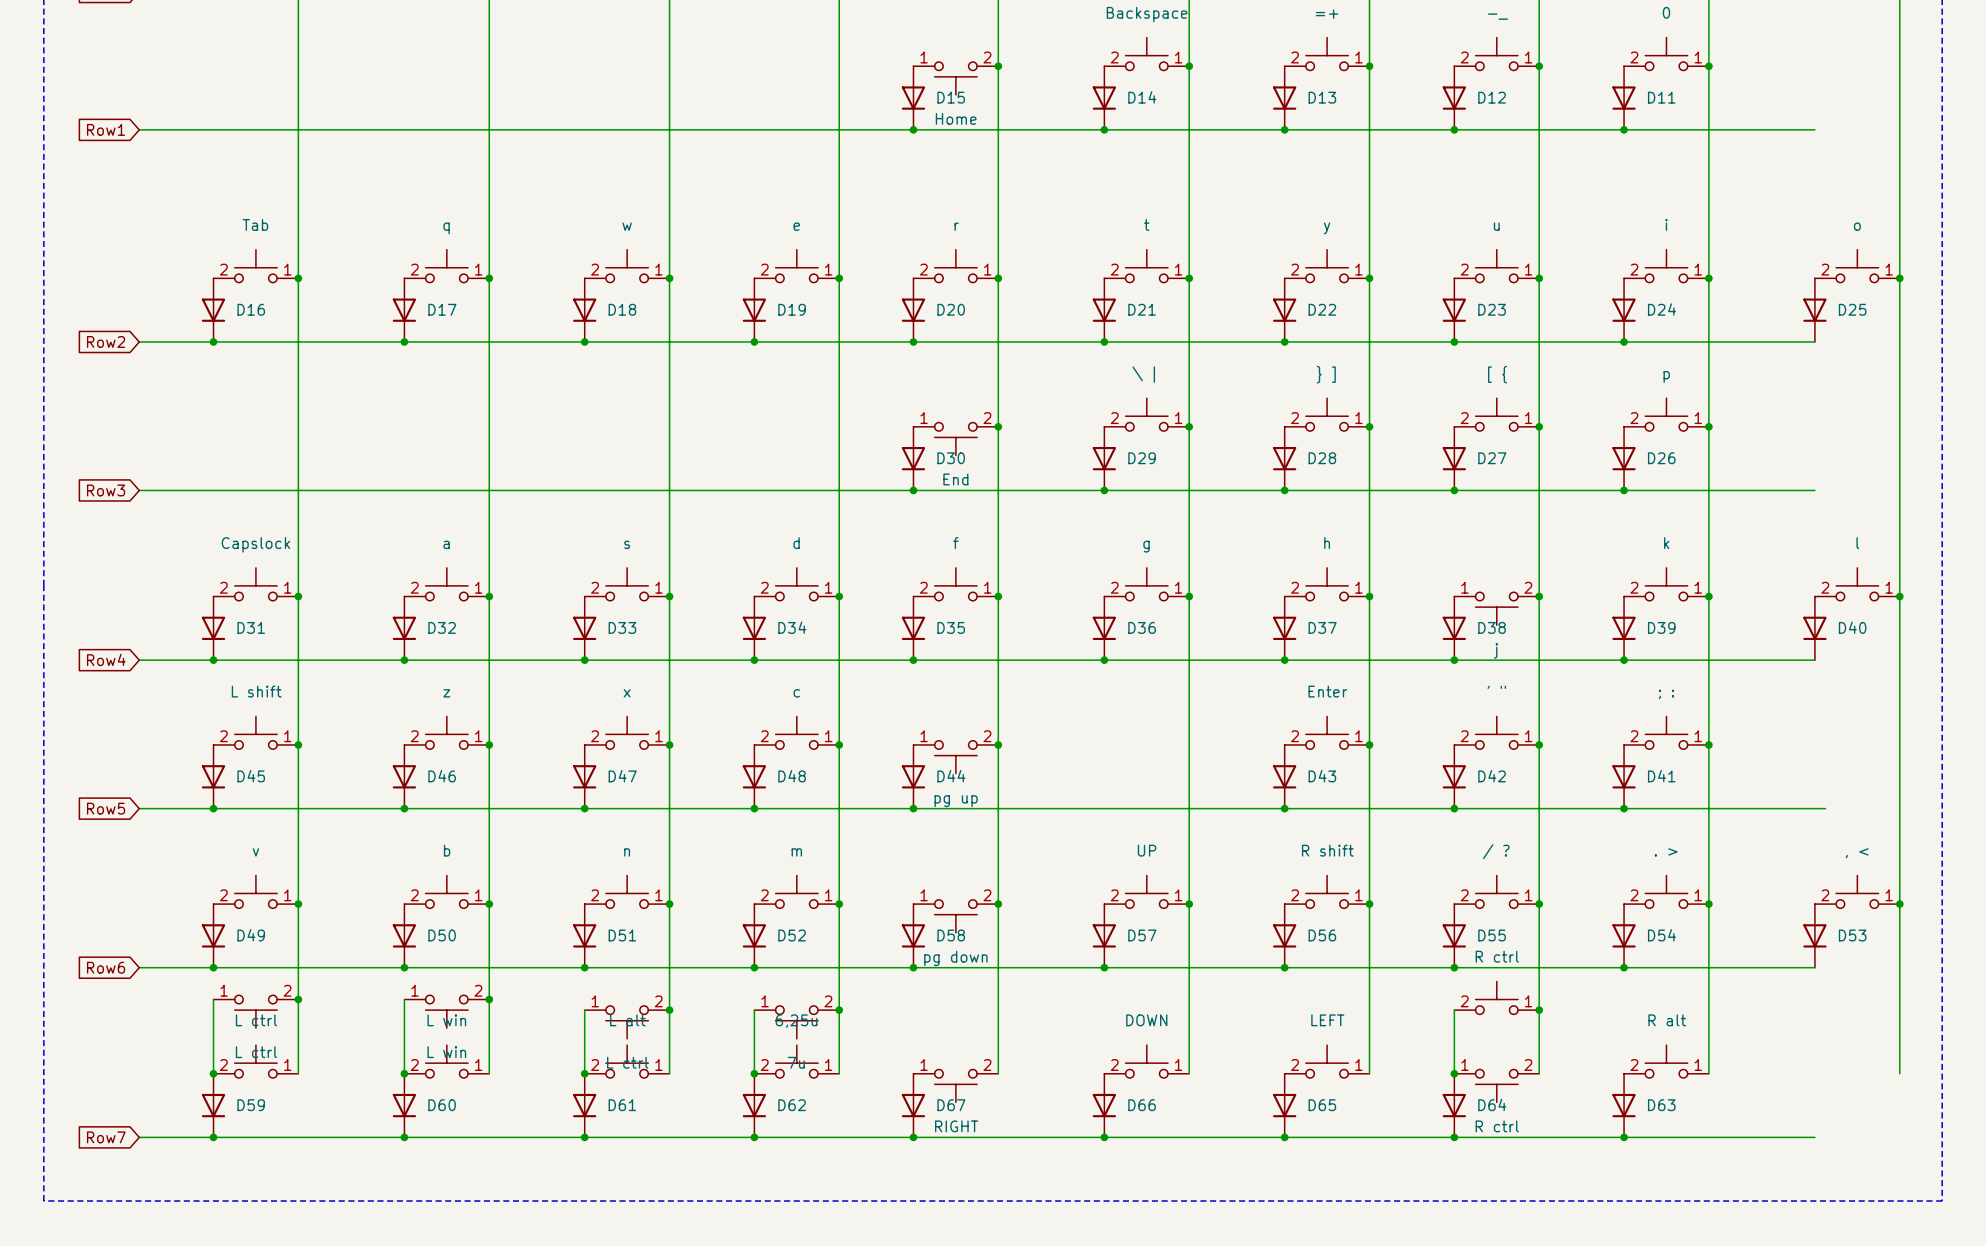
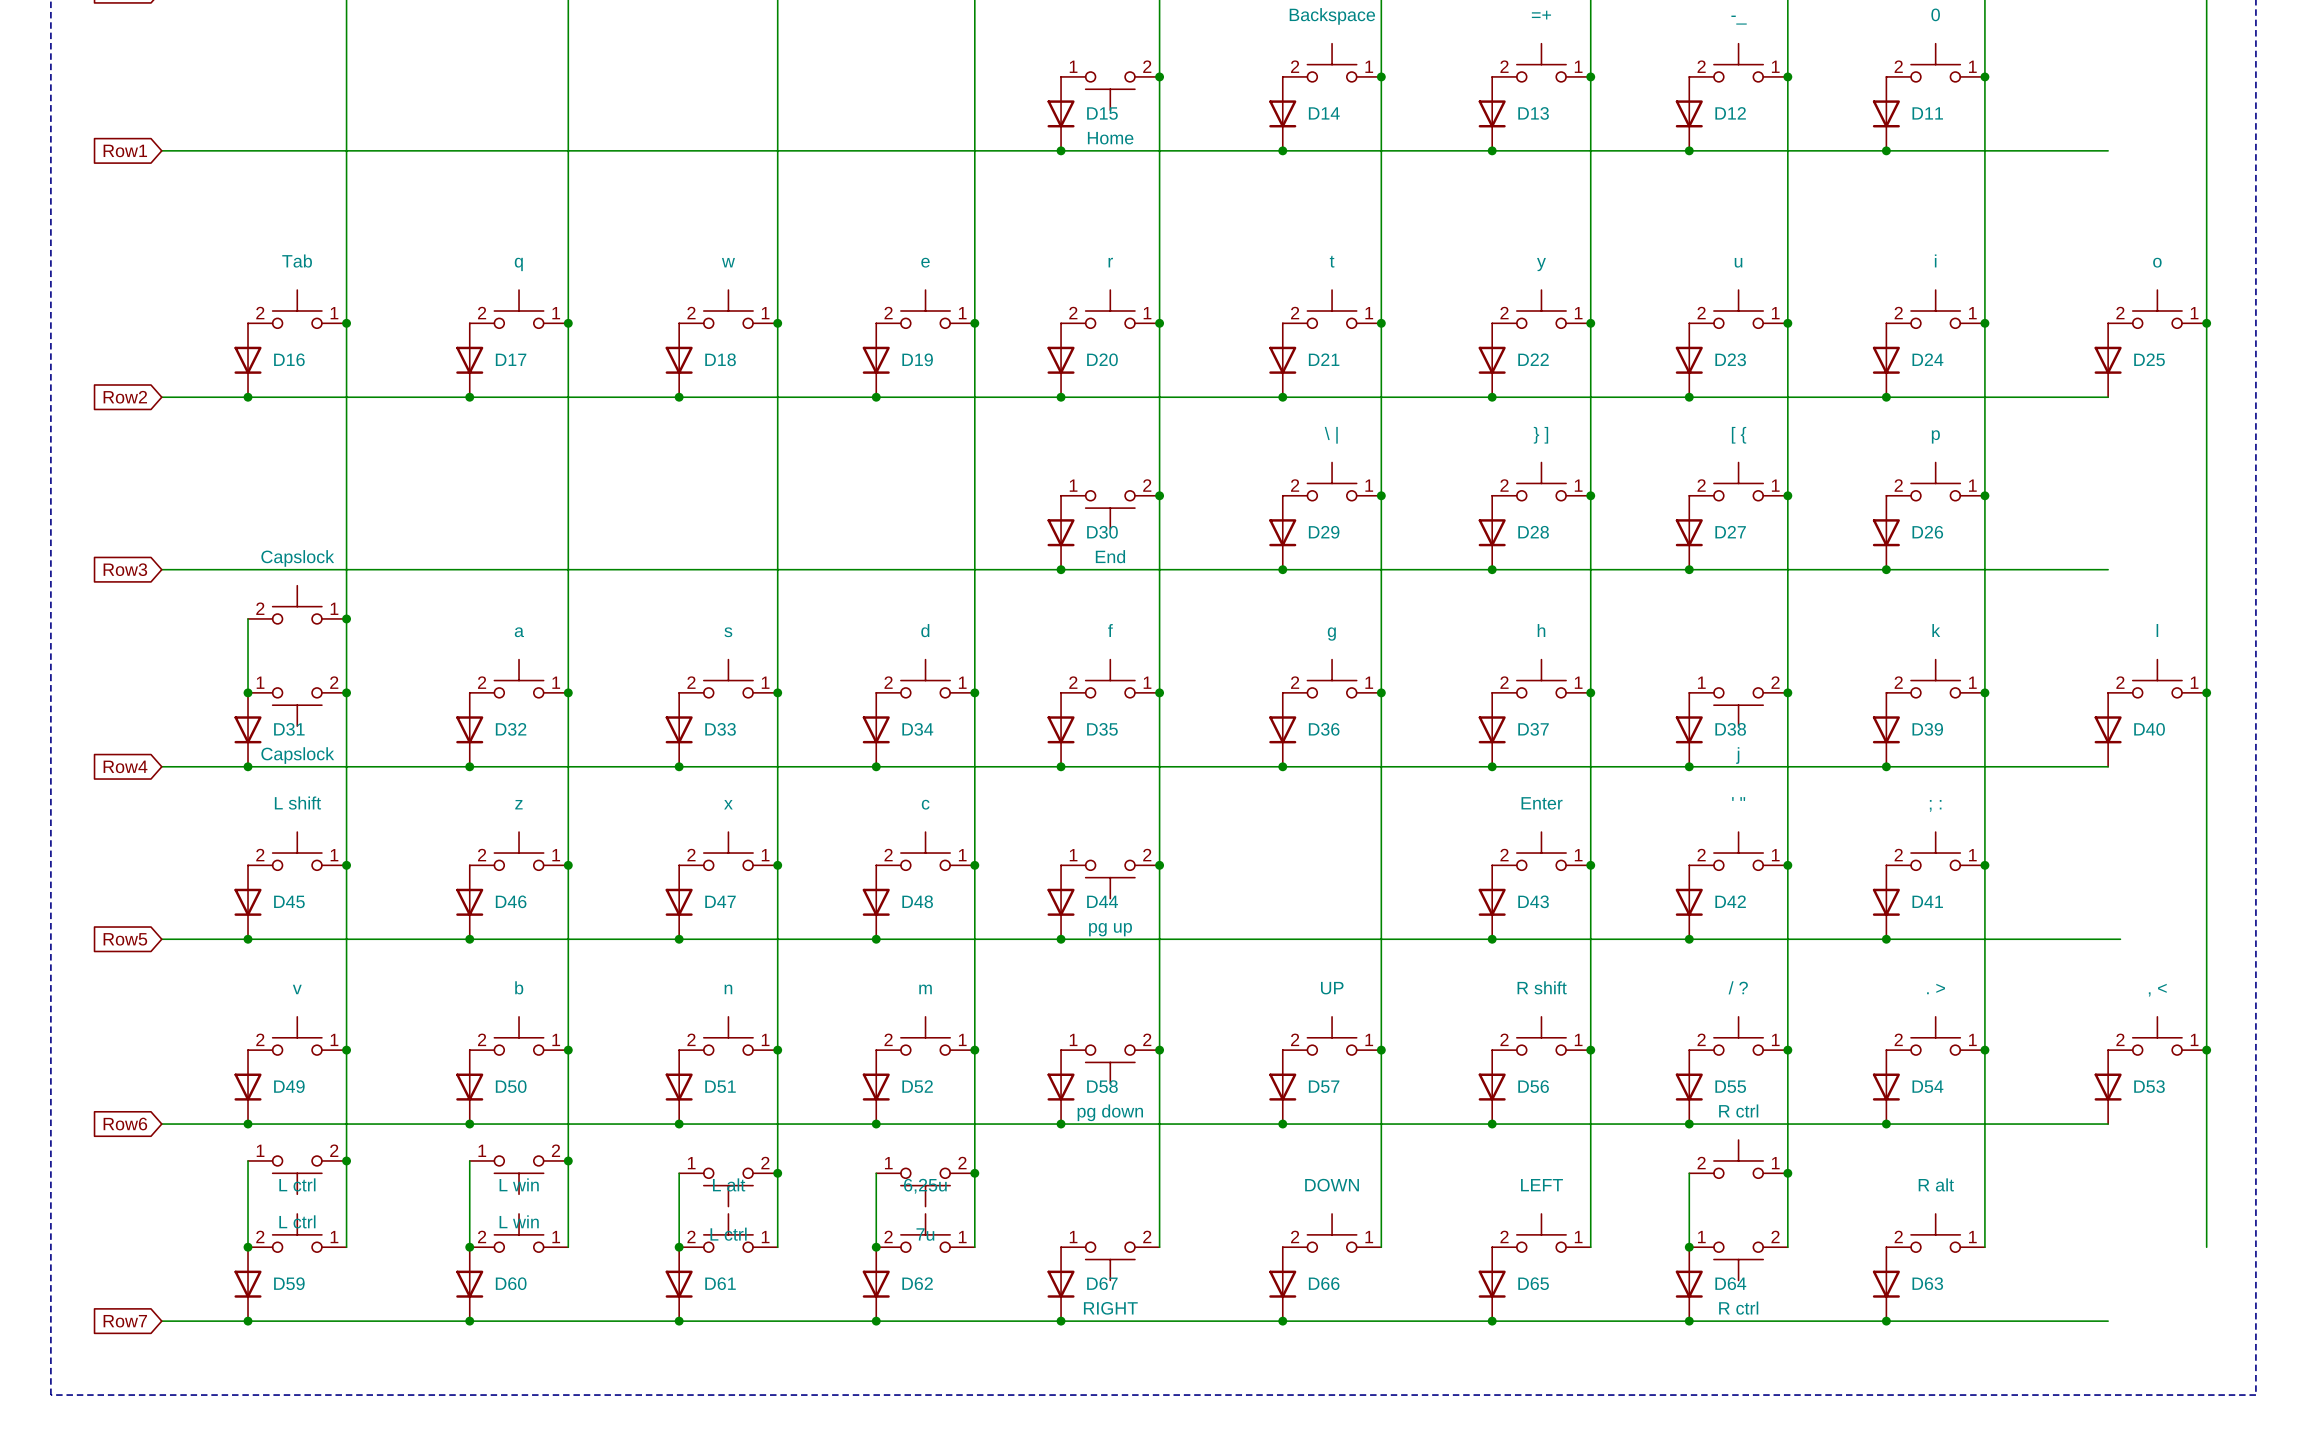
part: none -> Capslock (297, 604)
wire: none -> (248, 618) (248, 692)
junction: none -> (346, 618)
part rotation: 0° (255, 584) -> 180° (297, 707)
junction: none -> (248, 692)

